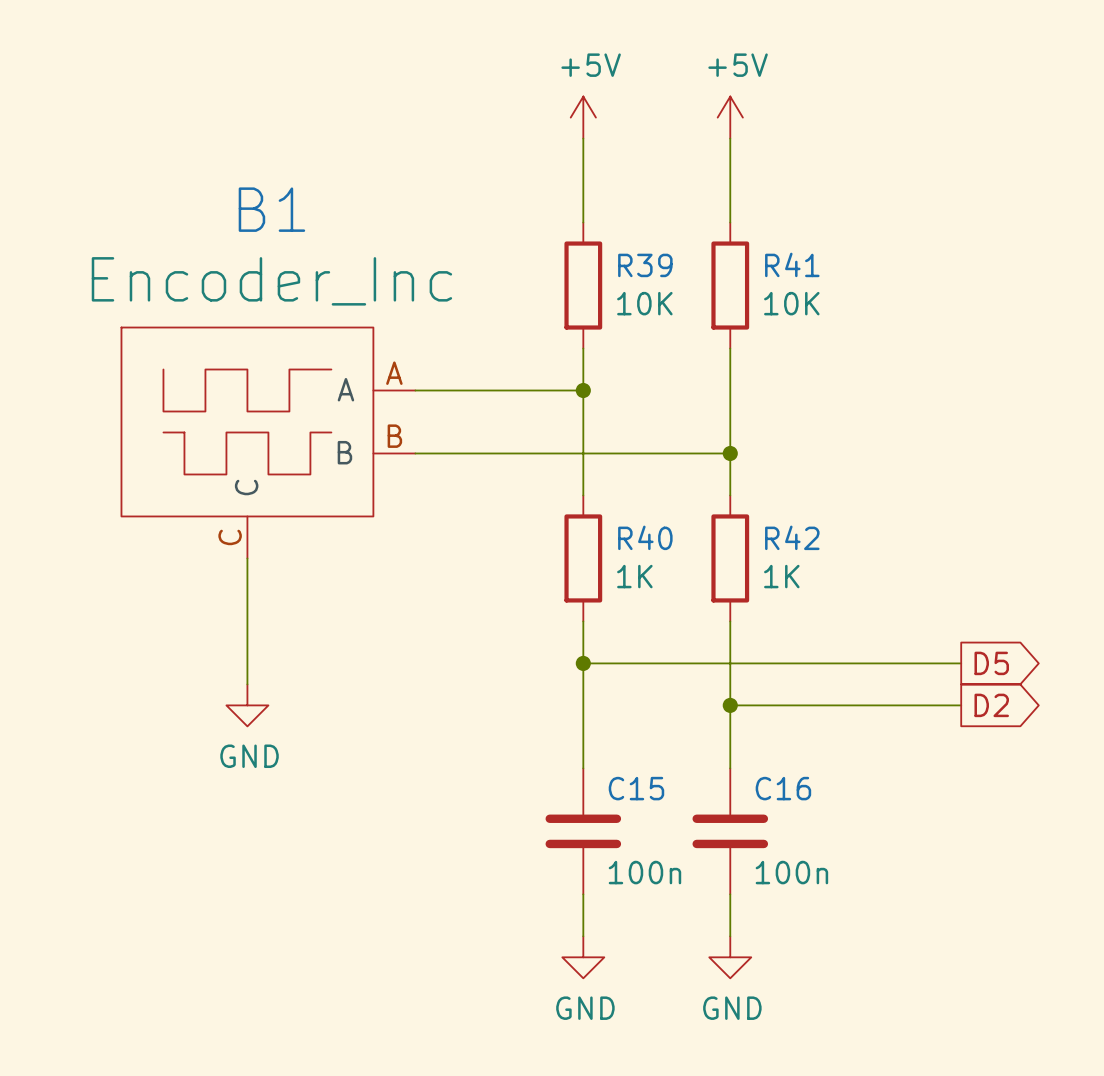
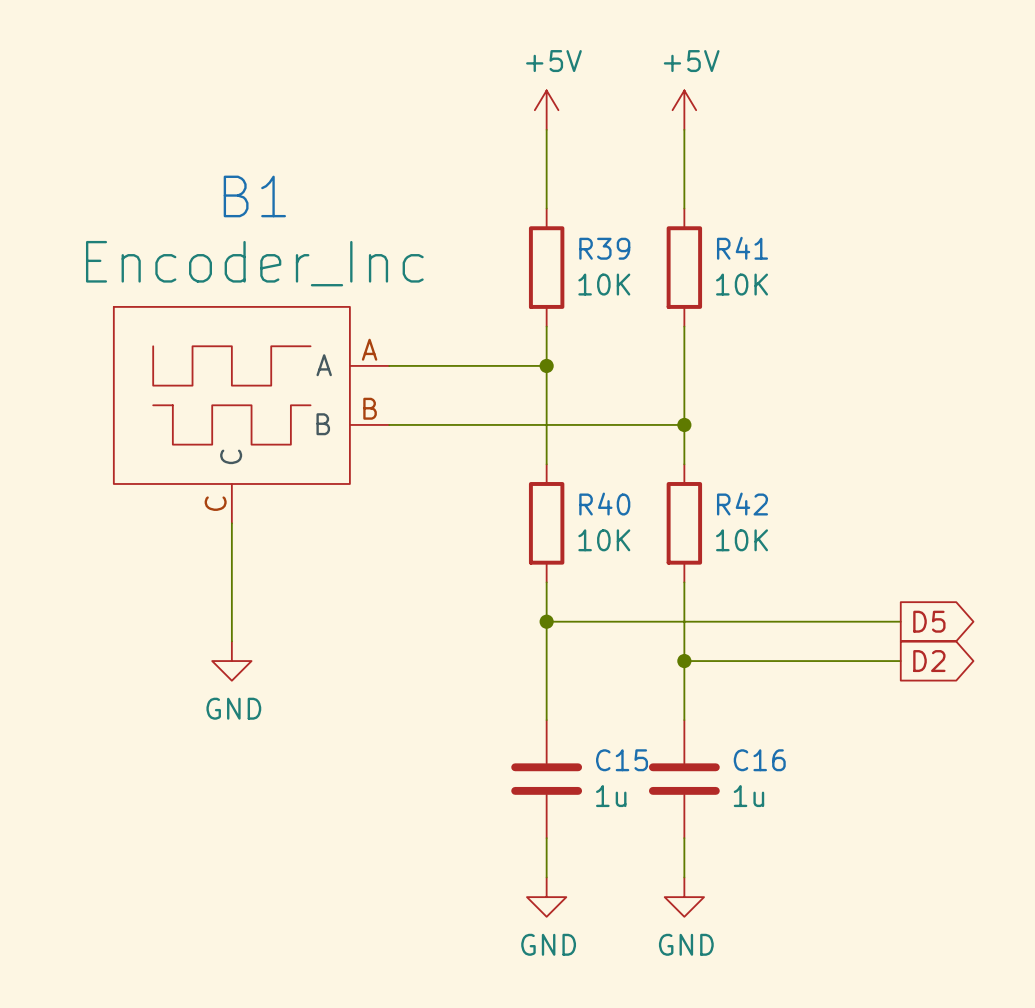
R40 value: 1K (634, 576) -> 10K (604, 540)
R42 value: 1K (781, 576) -> 10K (742, 540)
C15 name position: C15 (636, 788) -> C15 (622, 760)
C16 name position: C16 (783, 788) -> C16 (759, 760)
C15 value: 100n (644, 872) -> 1u (611, 796)
C16 value: 100n (791, 872) -> 1u (748, 796)

